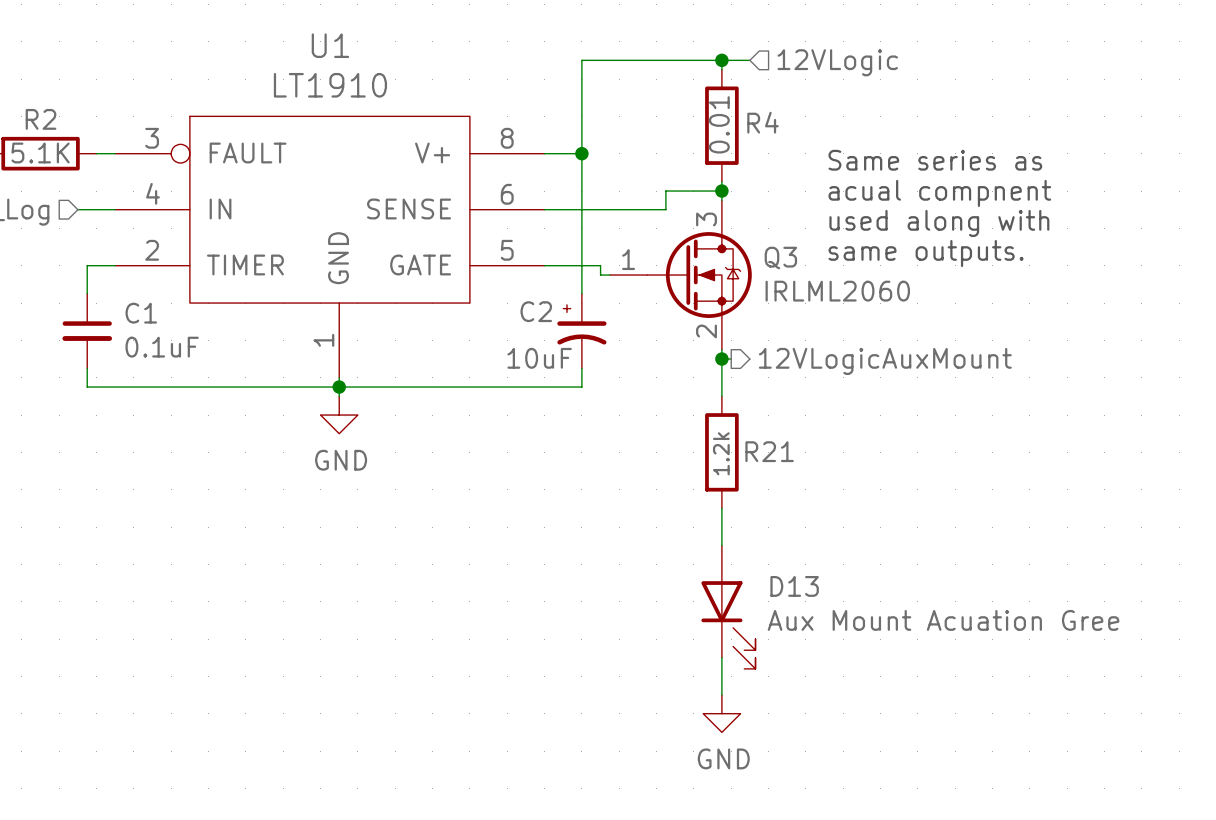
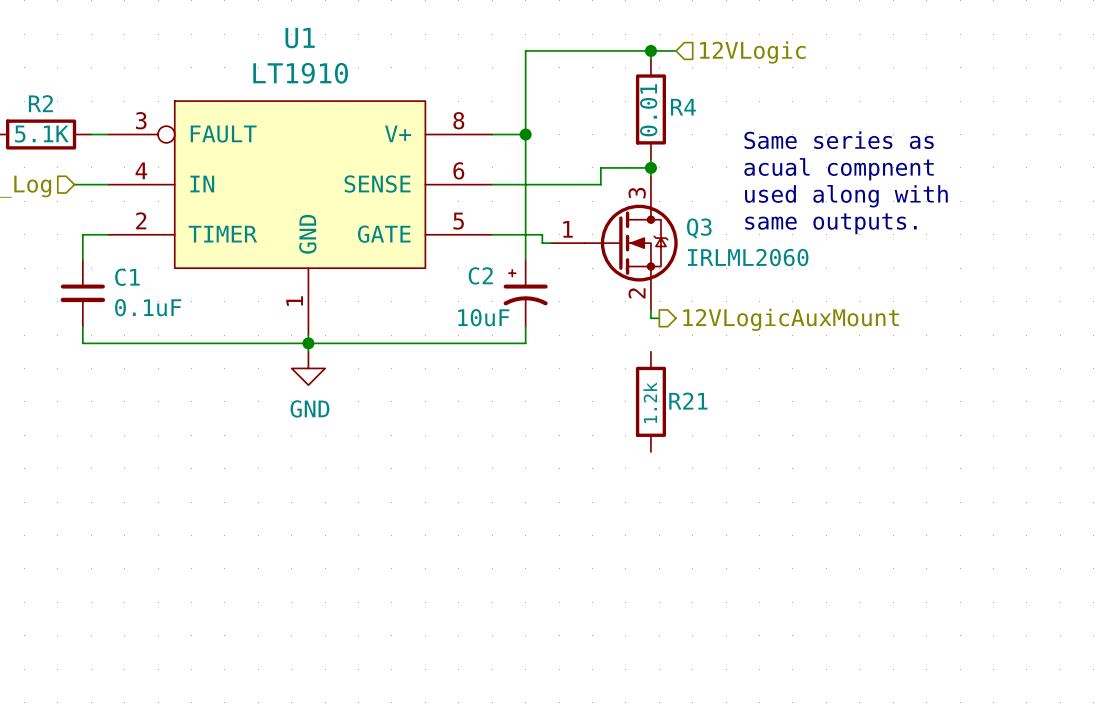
wire: (721, 359) (721, 396) -> none
junction: (721, 359) -> none
wire: (721, 508) (721, 545) -> none
D13: Aux Mount Acuation Gree (728, 607) -> none
wire: (721, 657) (721, 695) -> none
power symbol: GND (721, 713) -> none

